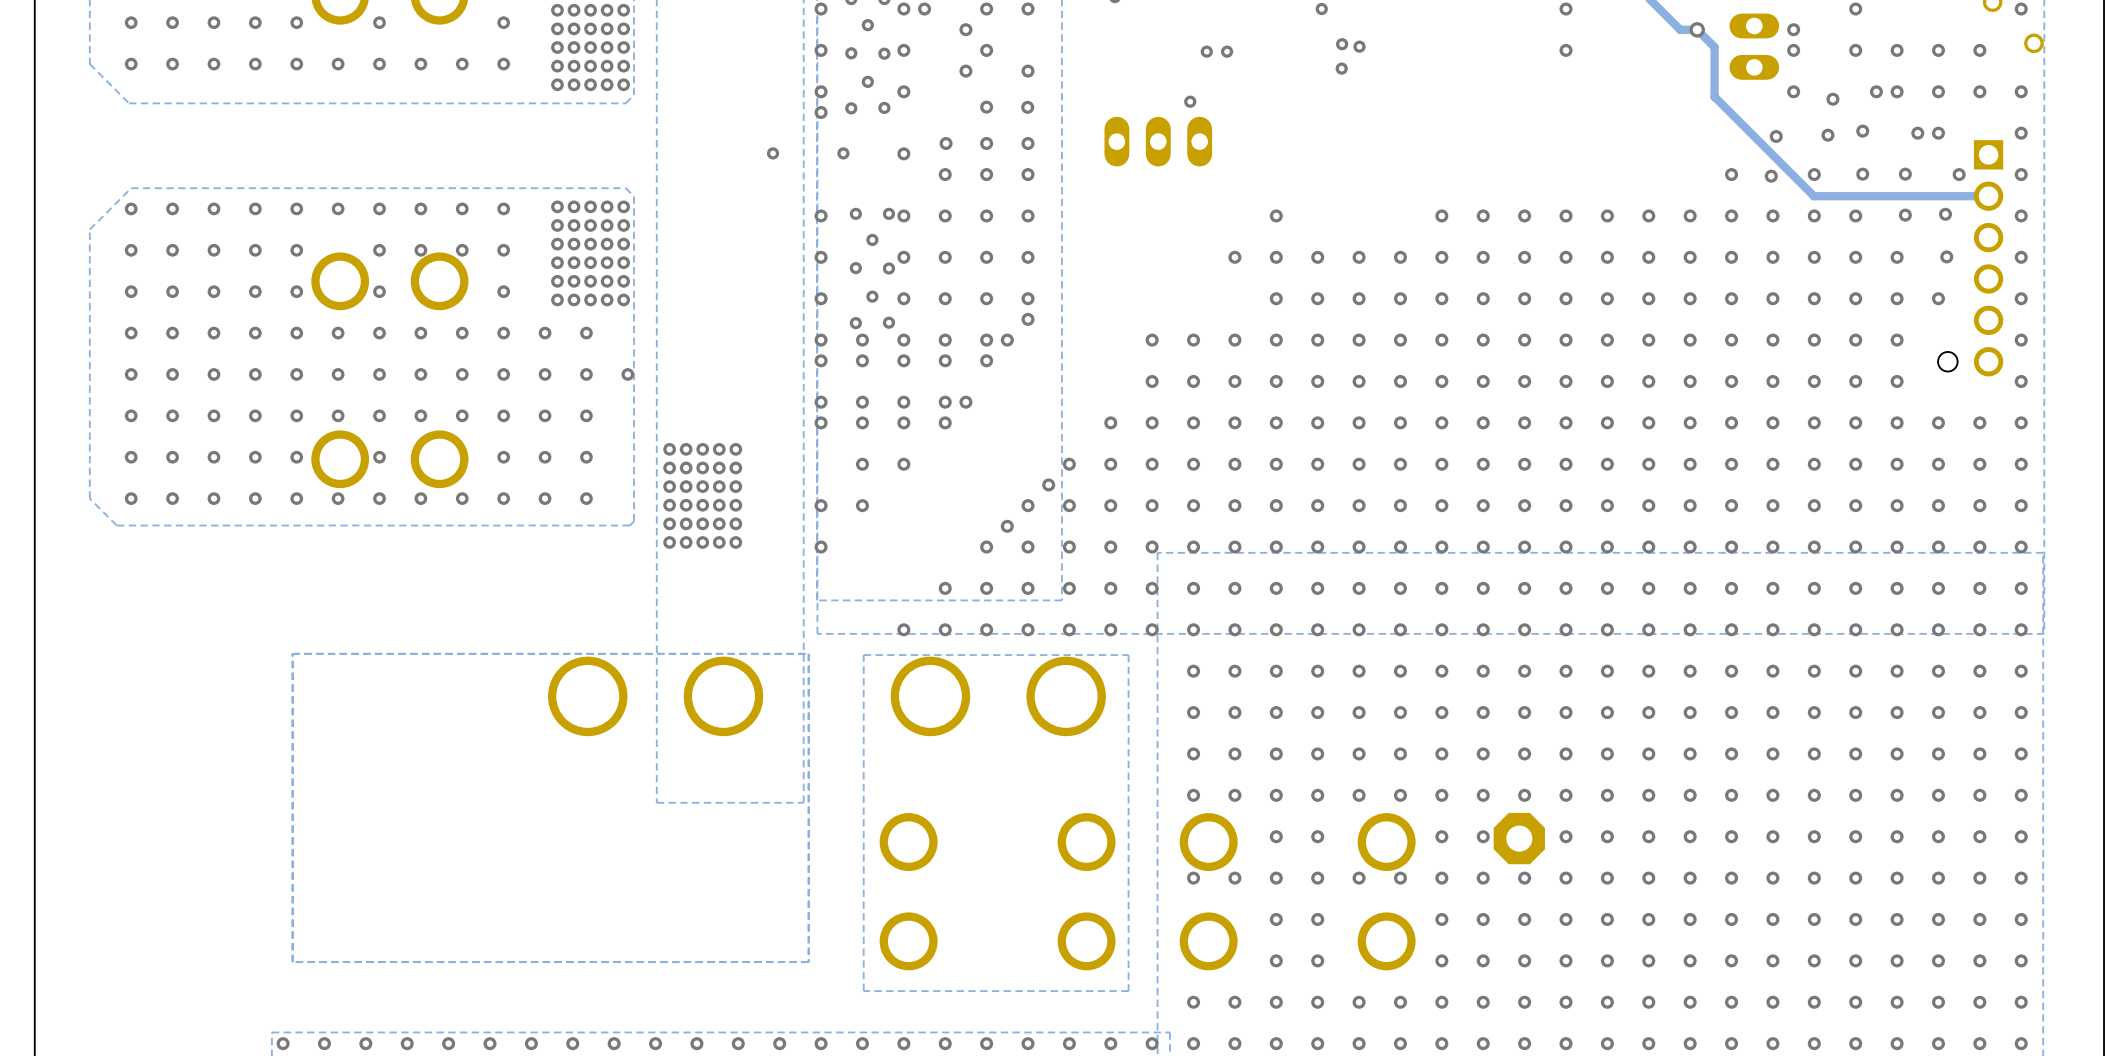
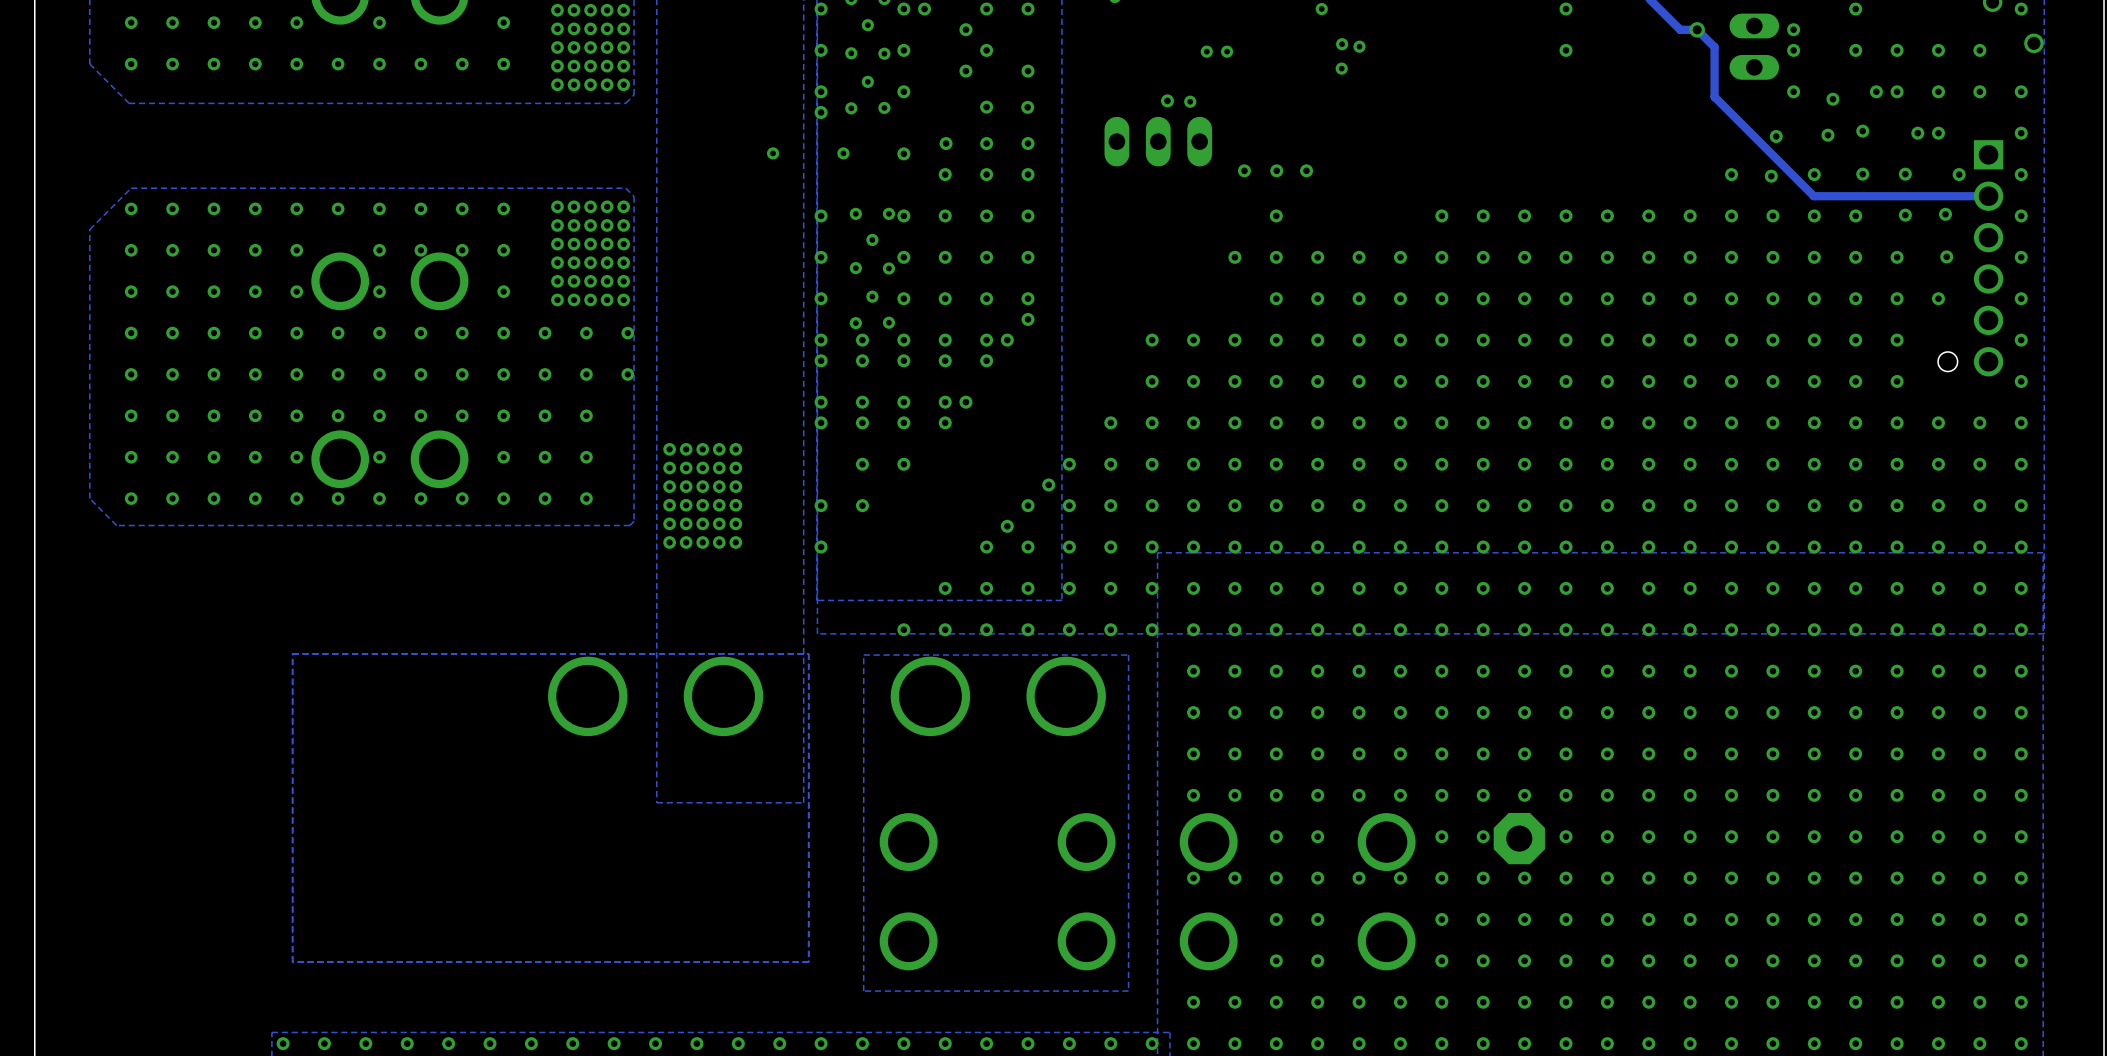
via: none -> (1167, 100)
via: none -> (1244, 170)
via: none -> (1276, 170)
via: none -> (1306, 170)
via: none -> (627, 333)

